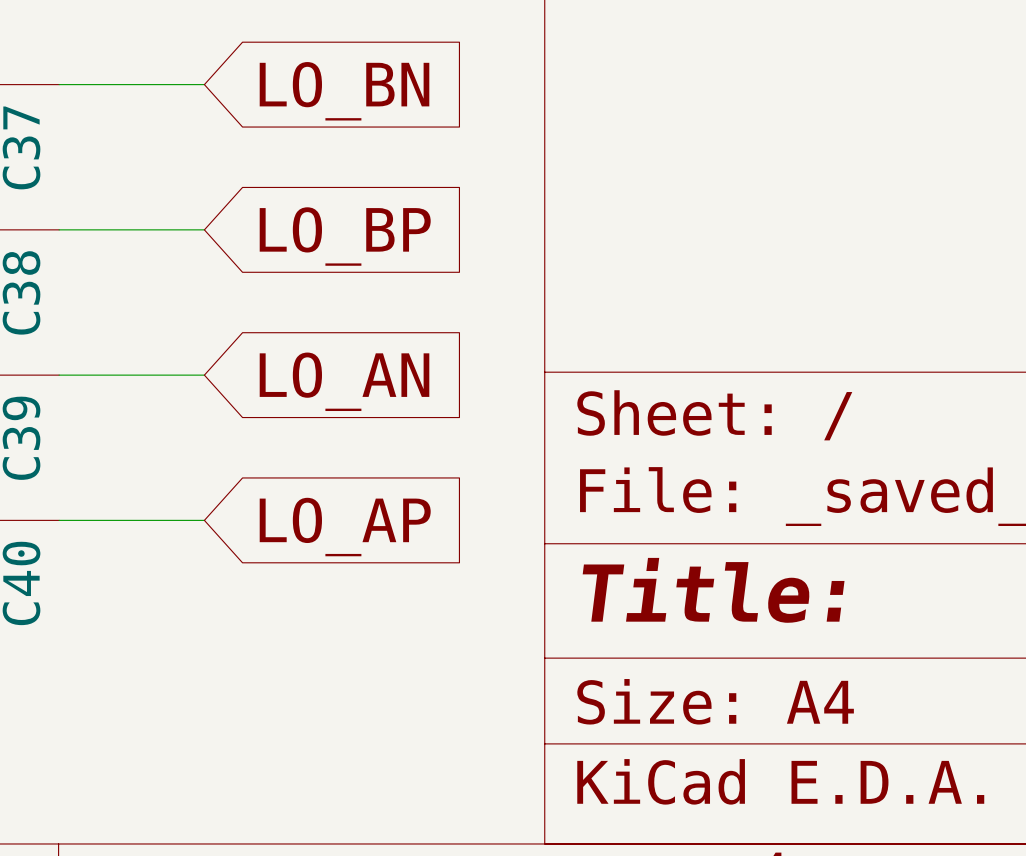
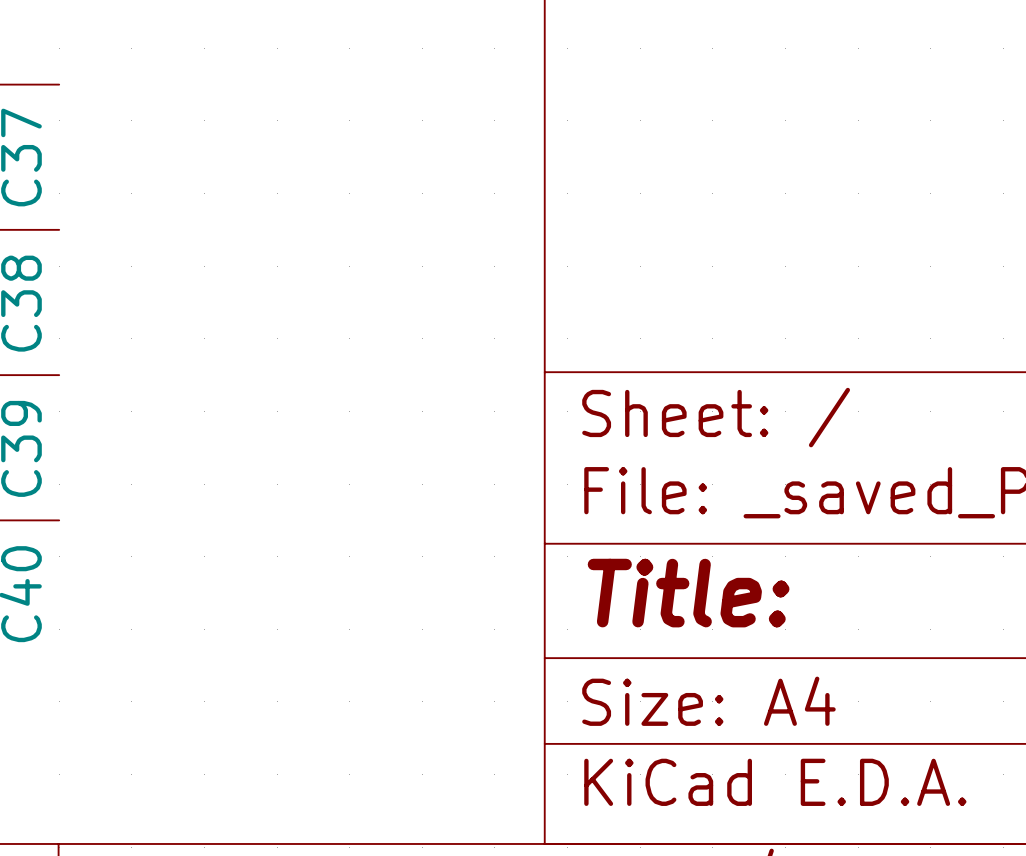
wire: (59, 84) (204, 84) -> none
global label: LO_BN (344, 91) -> none
wire: (59, 229) (204, 229) -> none
global label: LO_BP (345, 236) -> none
wire: (59, 375) (204, 375) -> none
global label: LO_AN (344, 381) -> none
wire: (59, 520) (204, 520) -> none
global label: LO_AP (345, 527) -> none

